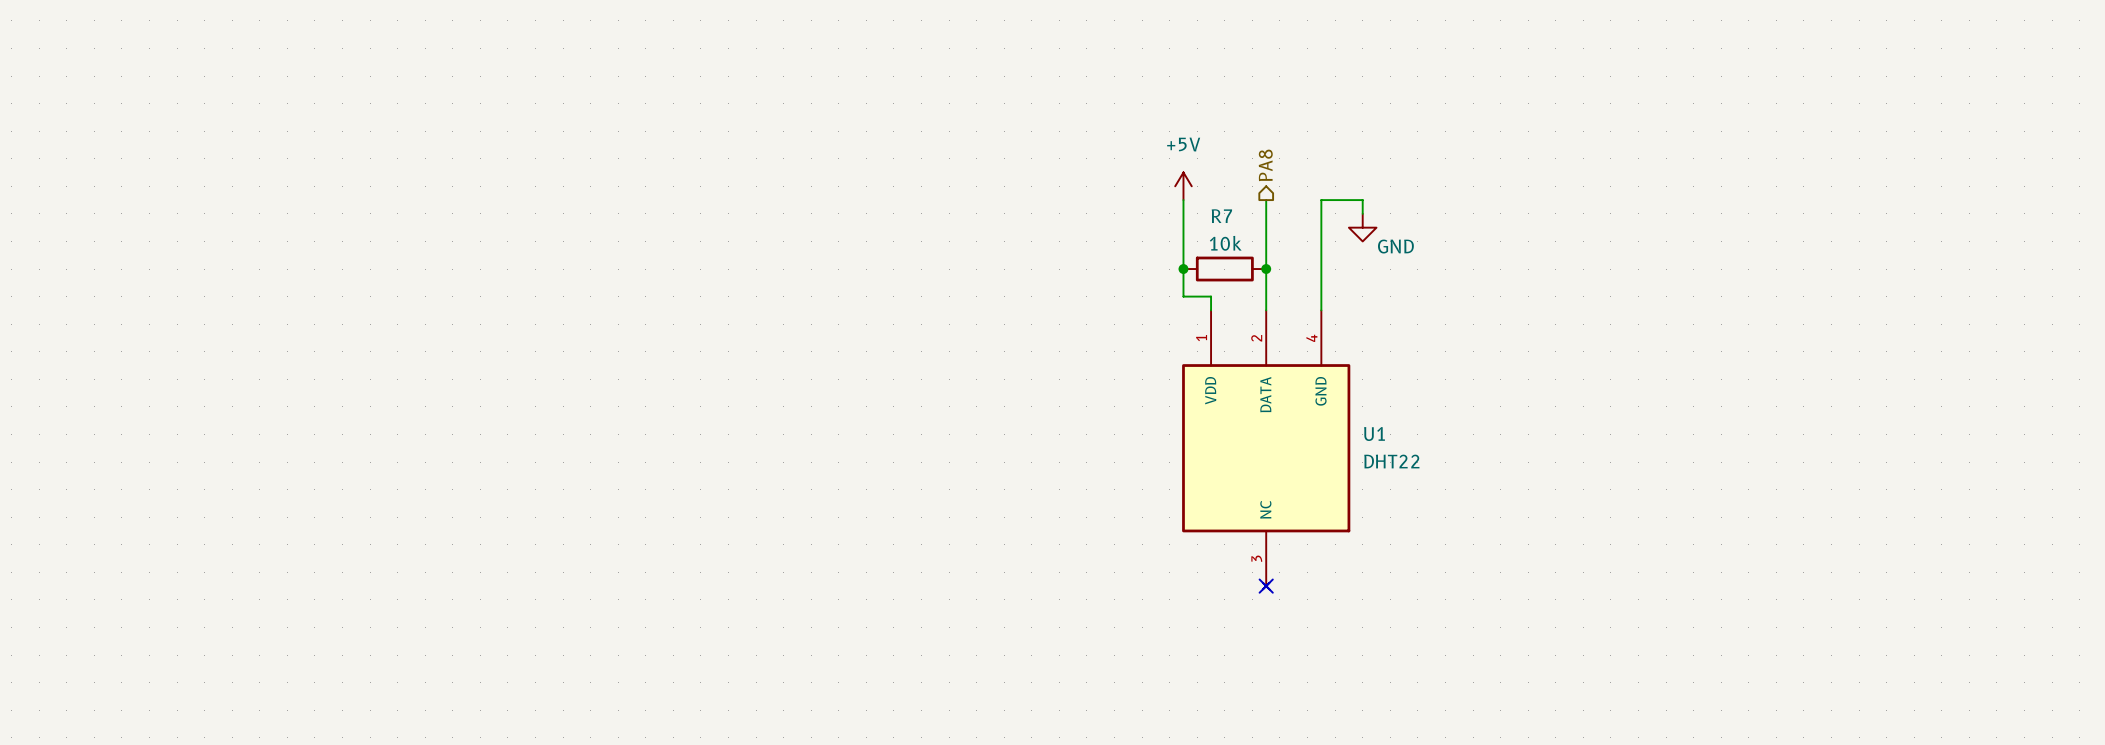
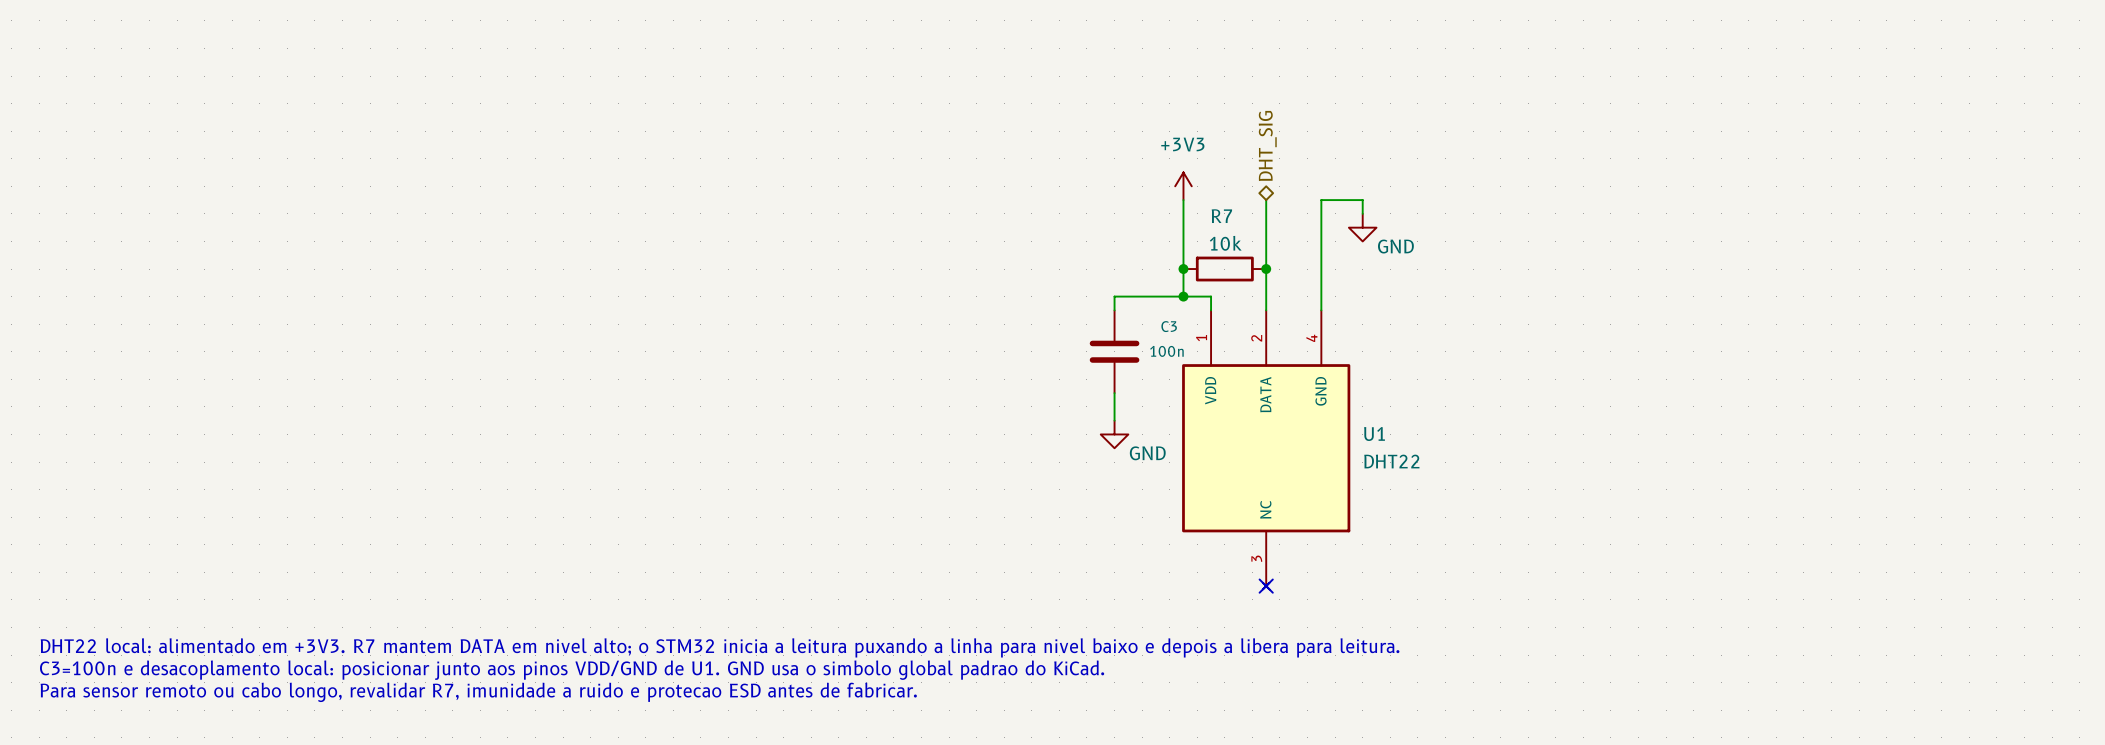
hierarchical label shape: output (1265, 165) -> bidirectional (1267, 145)
hierarchical label: PA8 (1265, 165) -> DHT_SIG (1267, 145)
power symbol: +5V (1183, 186) -> +3V3 (1183, 186)
wire: none -> (1183, 296) (1114, 296) (1114, 310)
junction: none -> (1183, 296)
C3: none -> 100n (1114, 351)
wire: none -> (1114, 393) (1114, 420)
power symbol: none -> GND (1114, 434)
text: none -> DHT22 local: alimentado em +3V3. R7 mantem DATA em nivel alto; o STM32 inicia a leitura puxando a linha para nivel baixo e depois a libera para leitura. (720, 647)
text: none -> C3=100n e desacoplamento local: posicionar junto aos pinos VDD/GND de U1. GND usa o simbolo global padrao do KiCad. (572, 670)
text: none -> Para sensor remoto ou cabo longo, revalidar R7, imunidade a ruido e protecao ESD antes de fabricar. (478, 692)

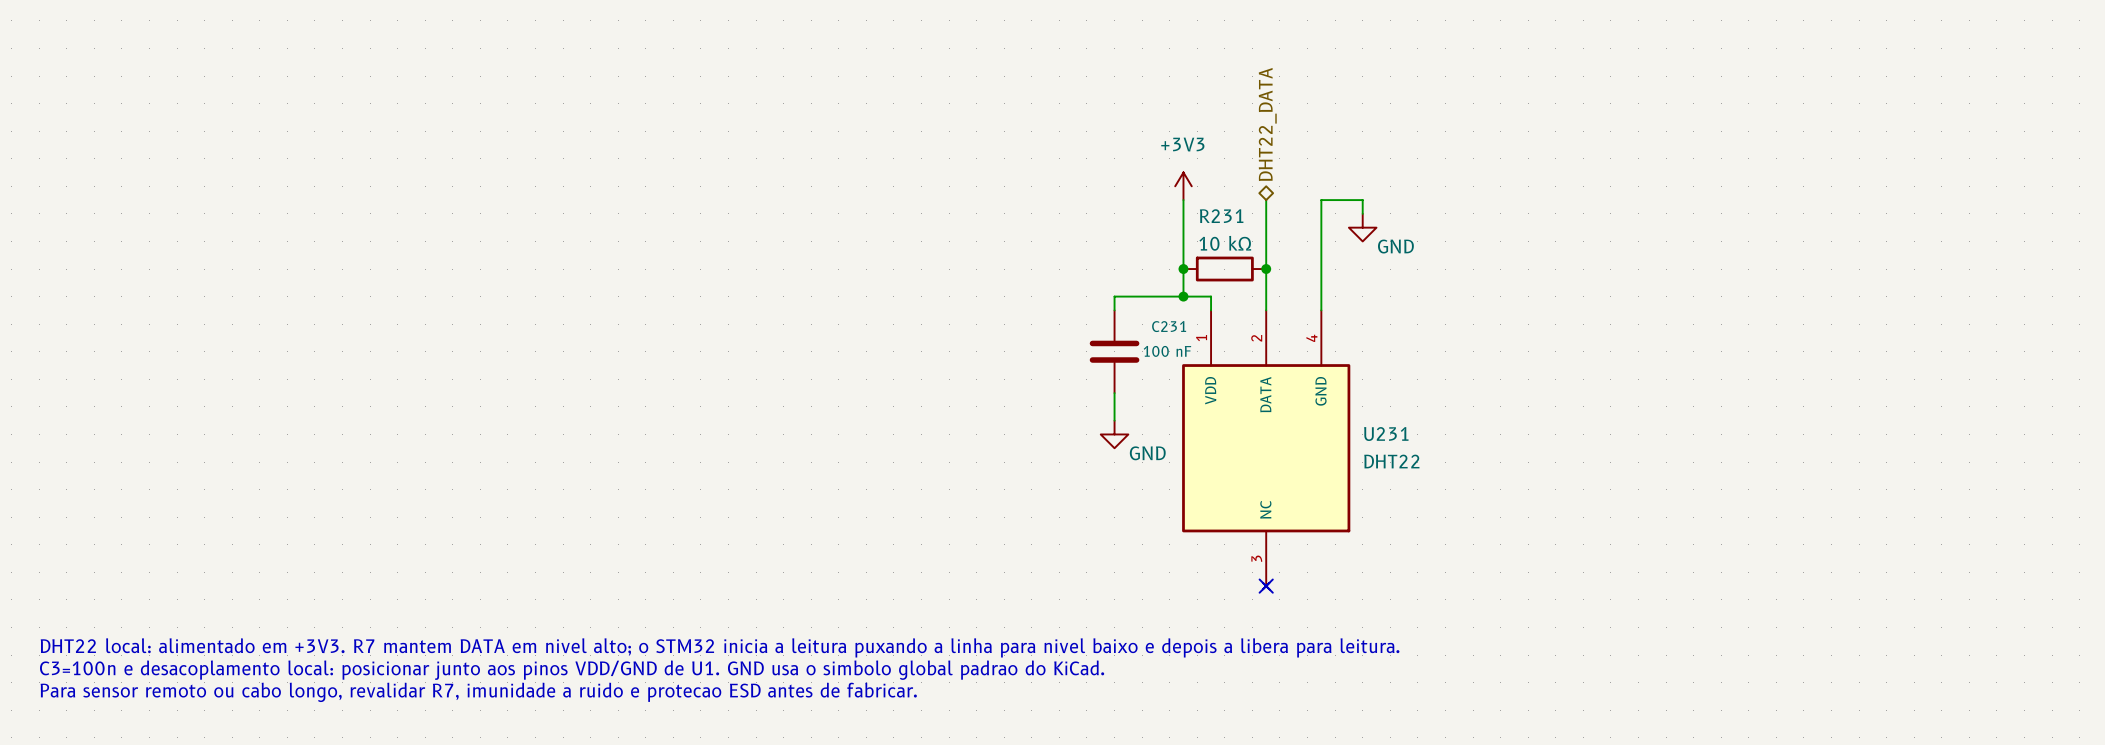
hierarchical label: DHT_SIG (1267, 145) -> DHT22_DATA (1267, 124)
R7 name: R7 (1221, 216) -> R231 (1221, 216)
R7 value: 10k (1225, 243) -> 10 kΩ (1225, 243)
C3 name: C3 (1169, 326) -> C231 (1169, 326)
C3 value: 100n (1166, 351) -> 100 nF (1167, 351)
U1 name: U1 (1374, 434) -> U231 (1386, 434)

